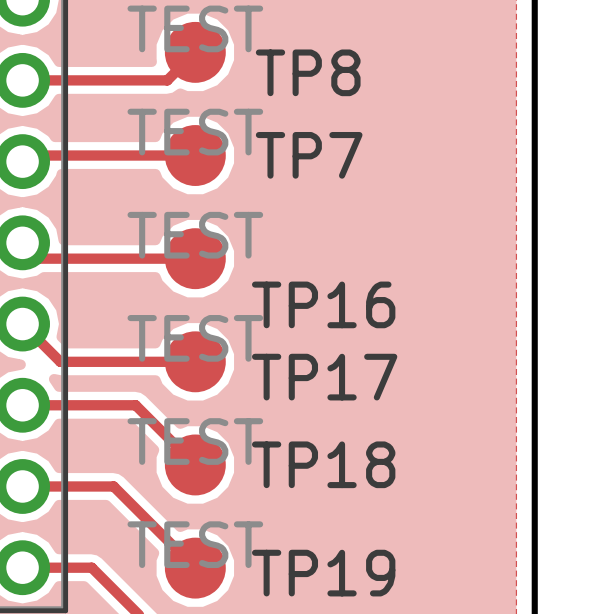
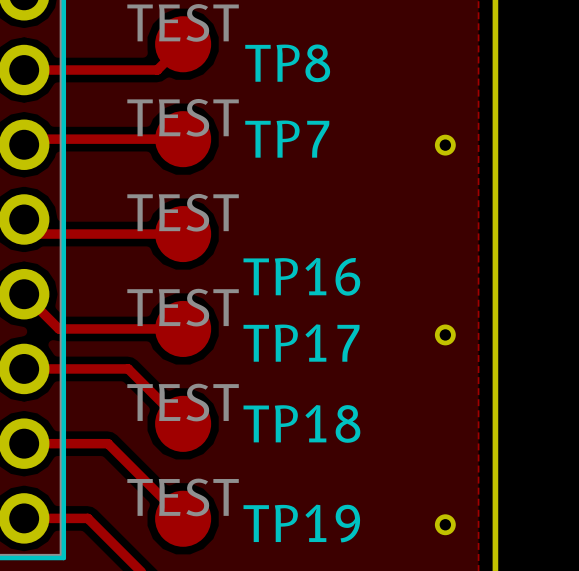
part: none -> (445, 145)
part: none -> (445, 334)
part: none -> (445, 524)

